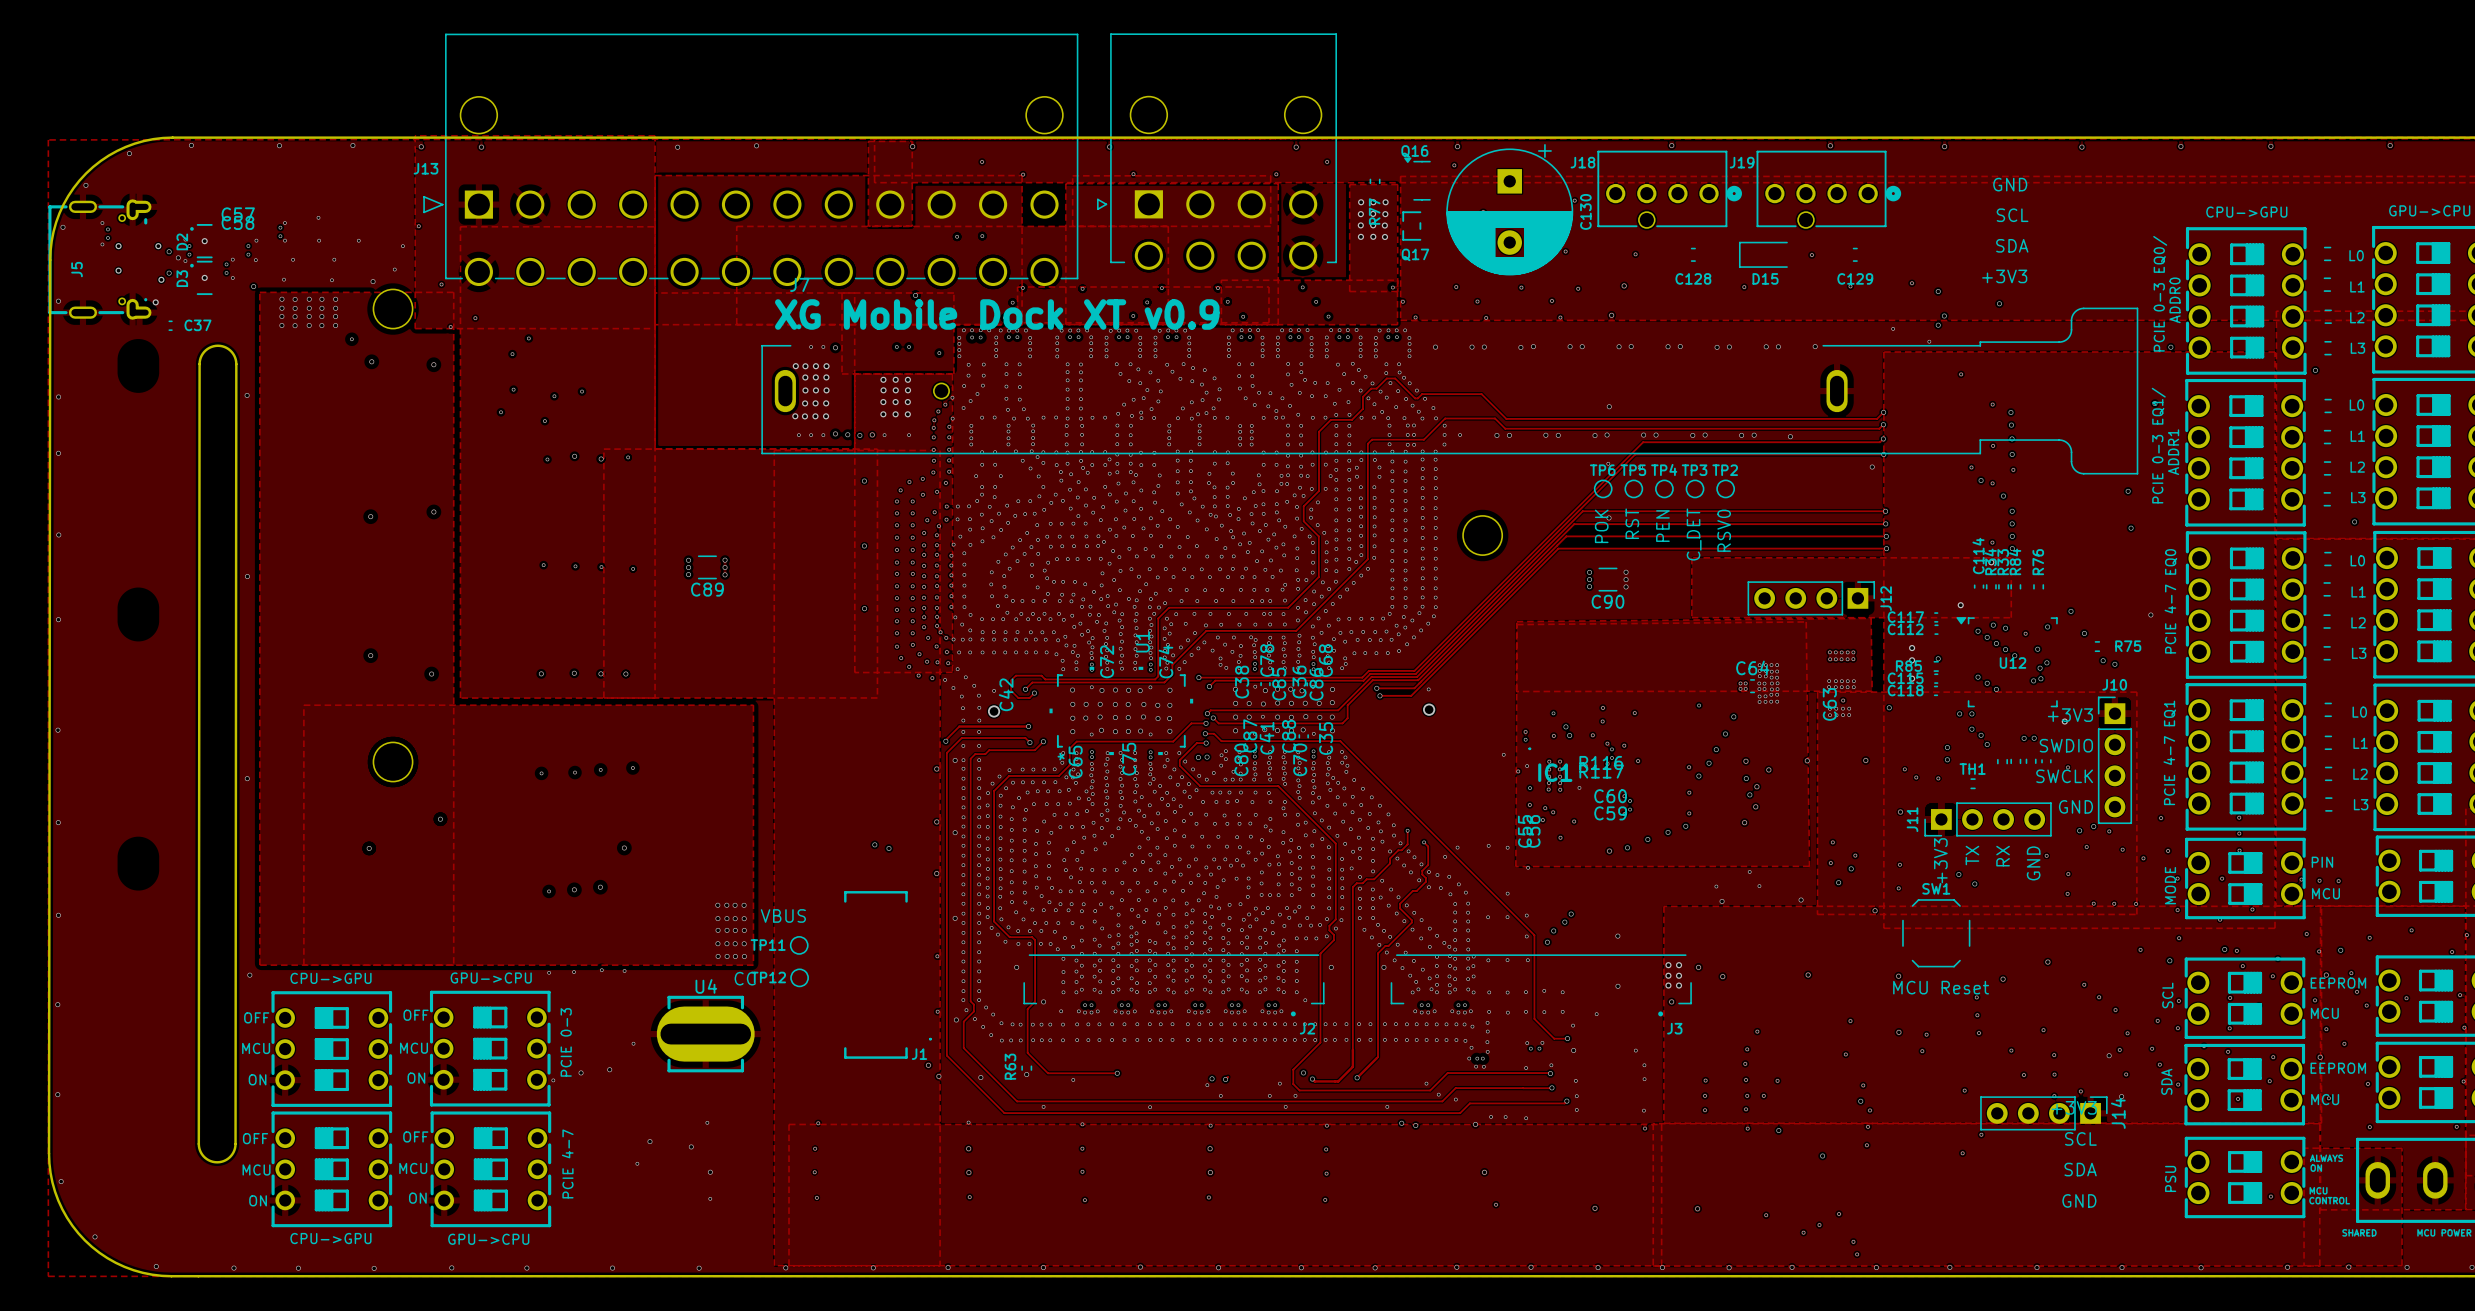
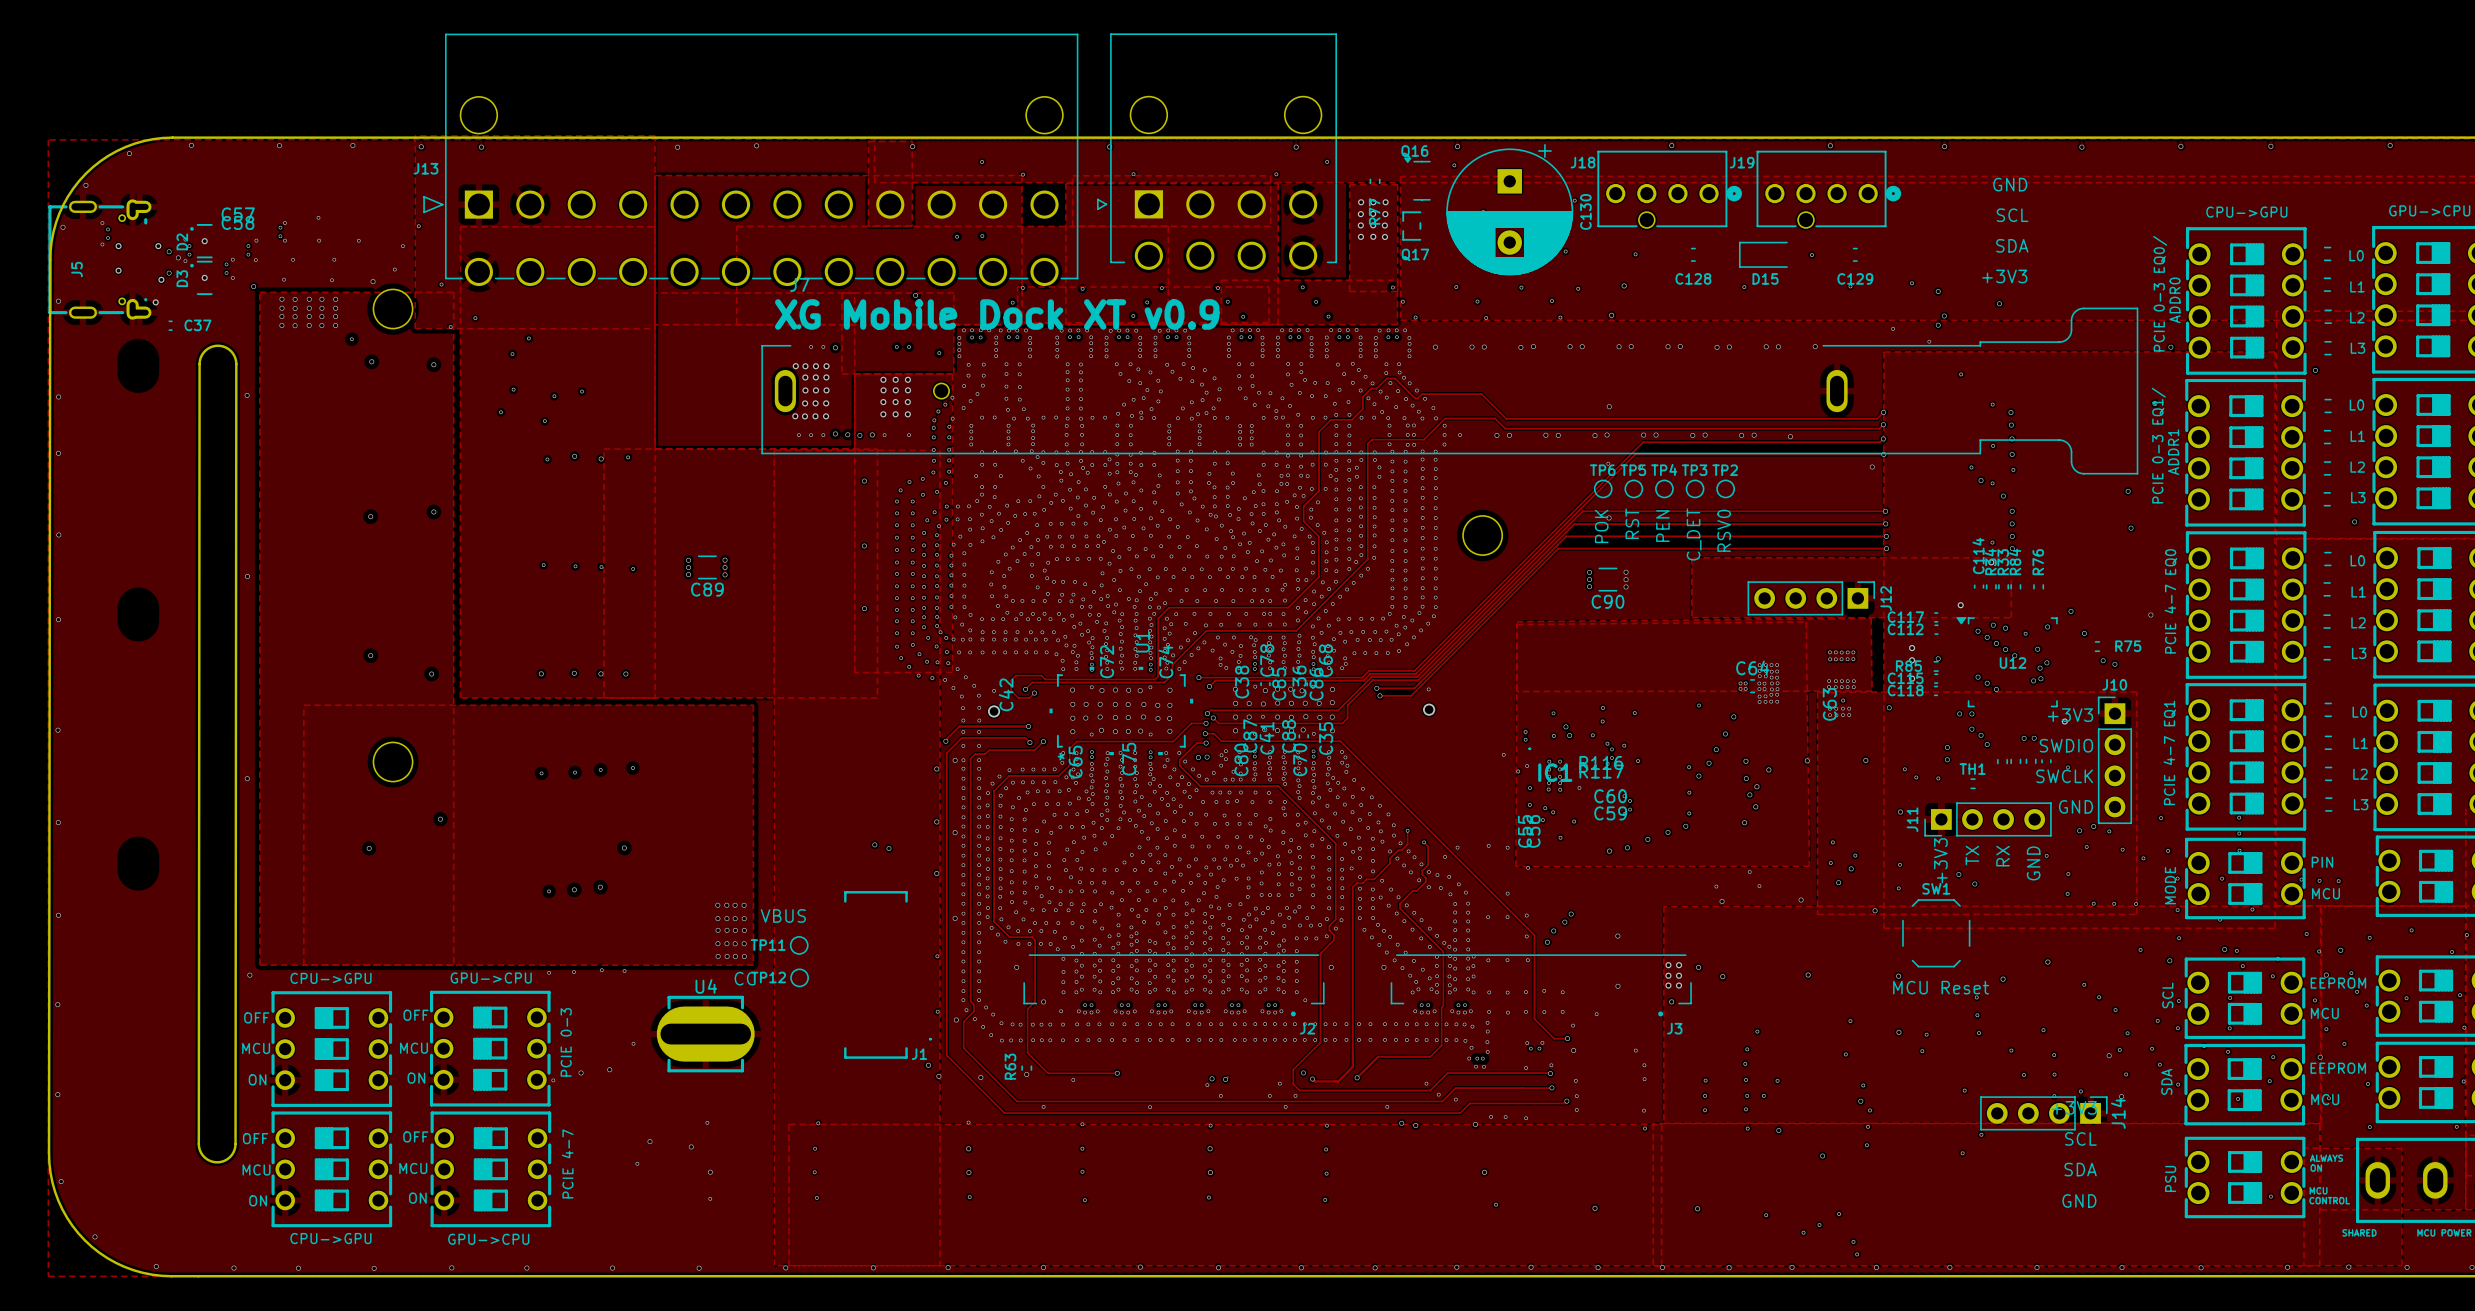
track: (1411, 920) (1411, 922) (1388, 945) (1385, 945) (1378, 953) (1378, 1056) -> (1411, 920) (1443, 951) (1441, 1045) (1430, 1056) (1378, 1056)

